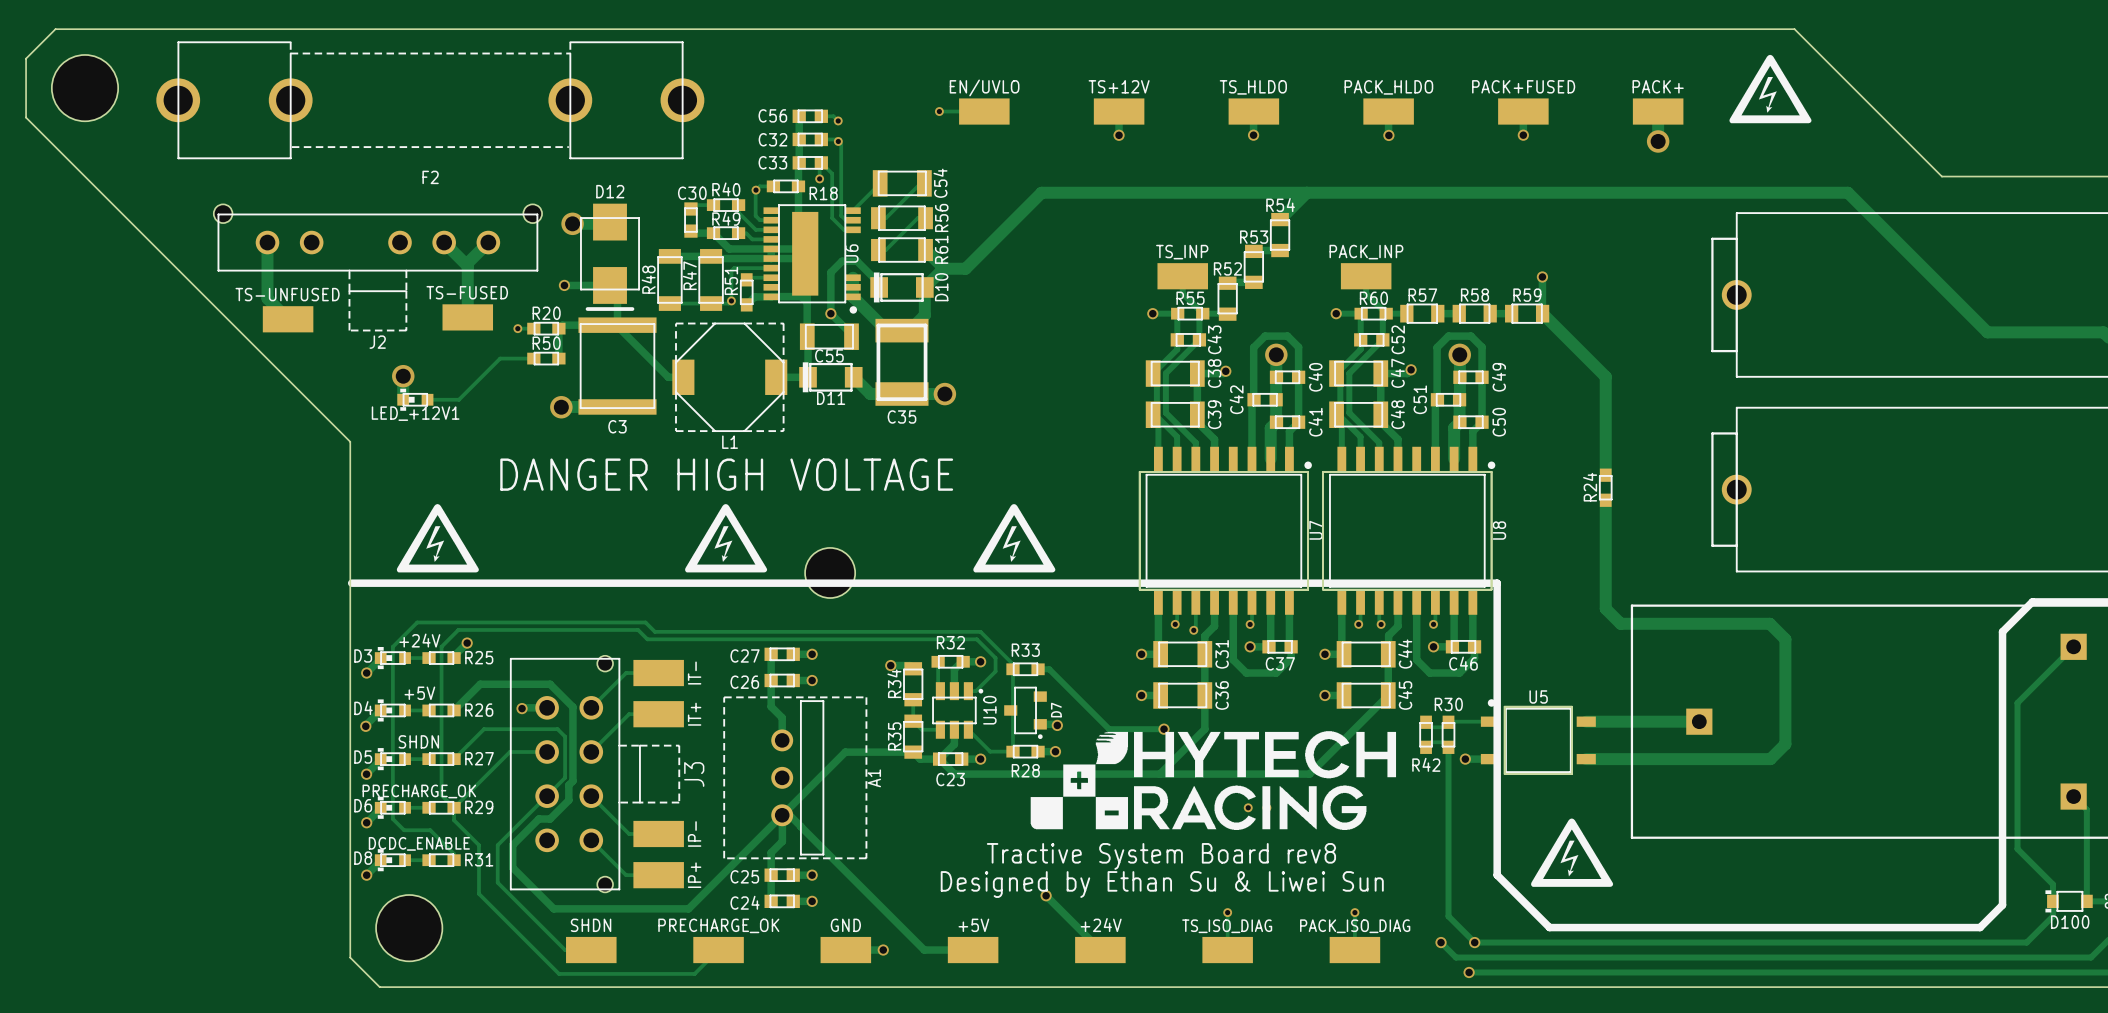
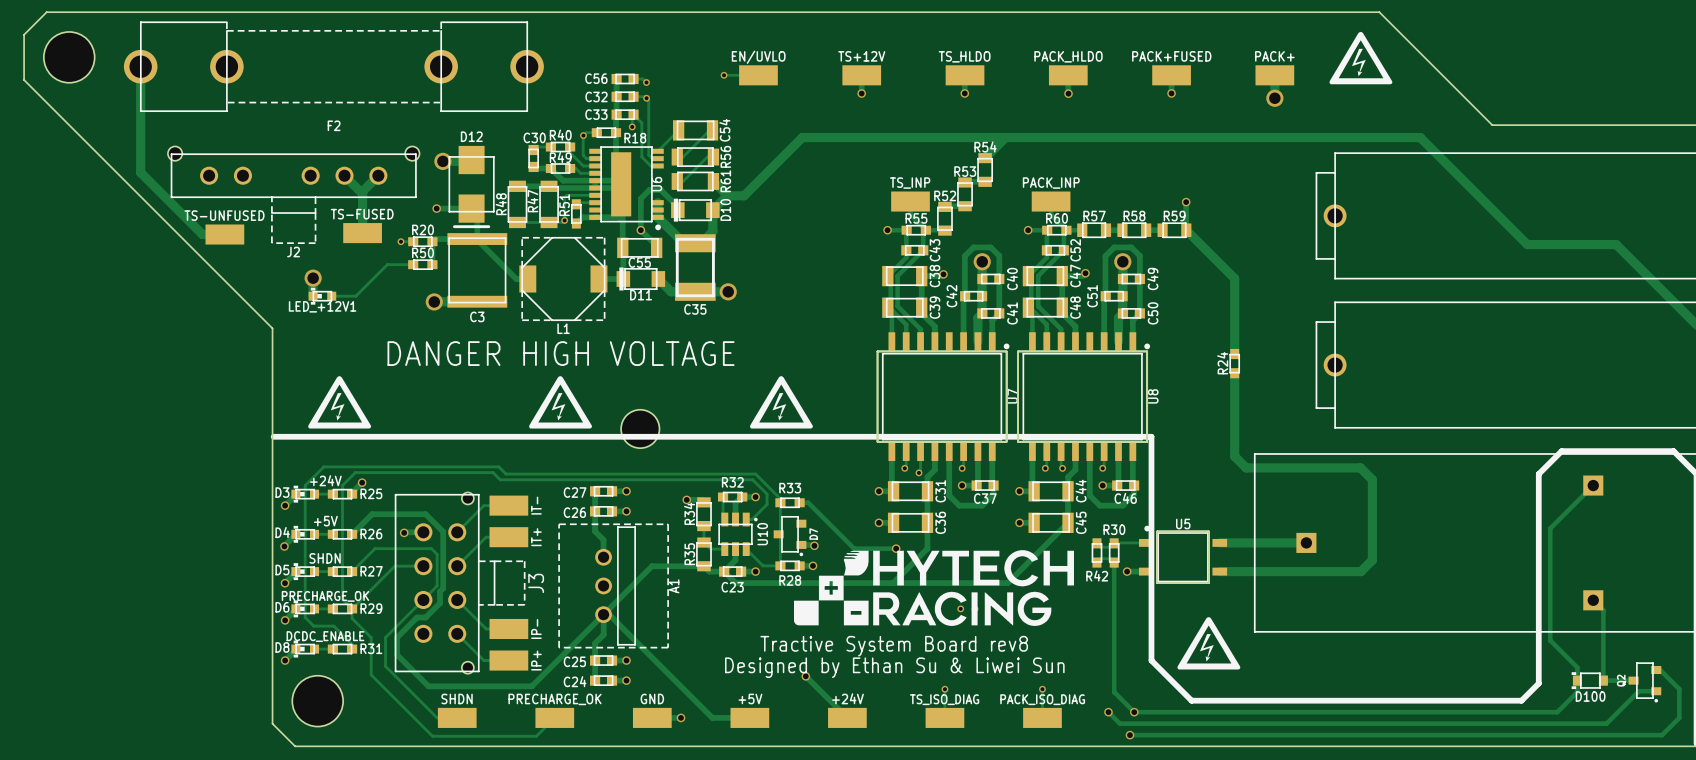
track: (267, 242) (267, 298) (288, 319) -> (140, 66) (140, 172) (202, 234) (224, 234)

